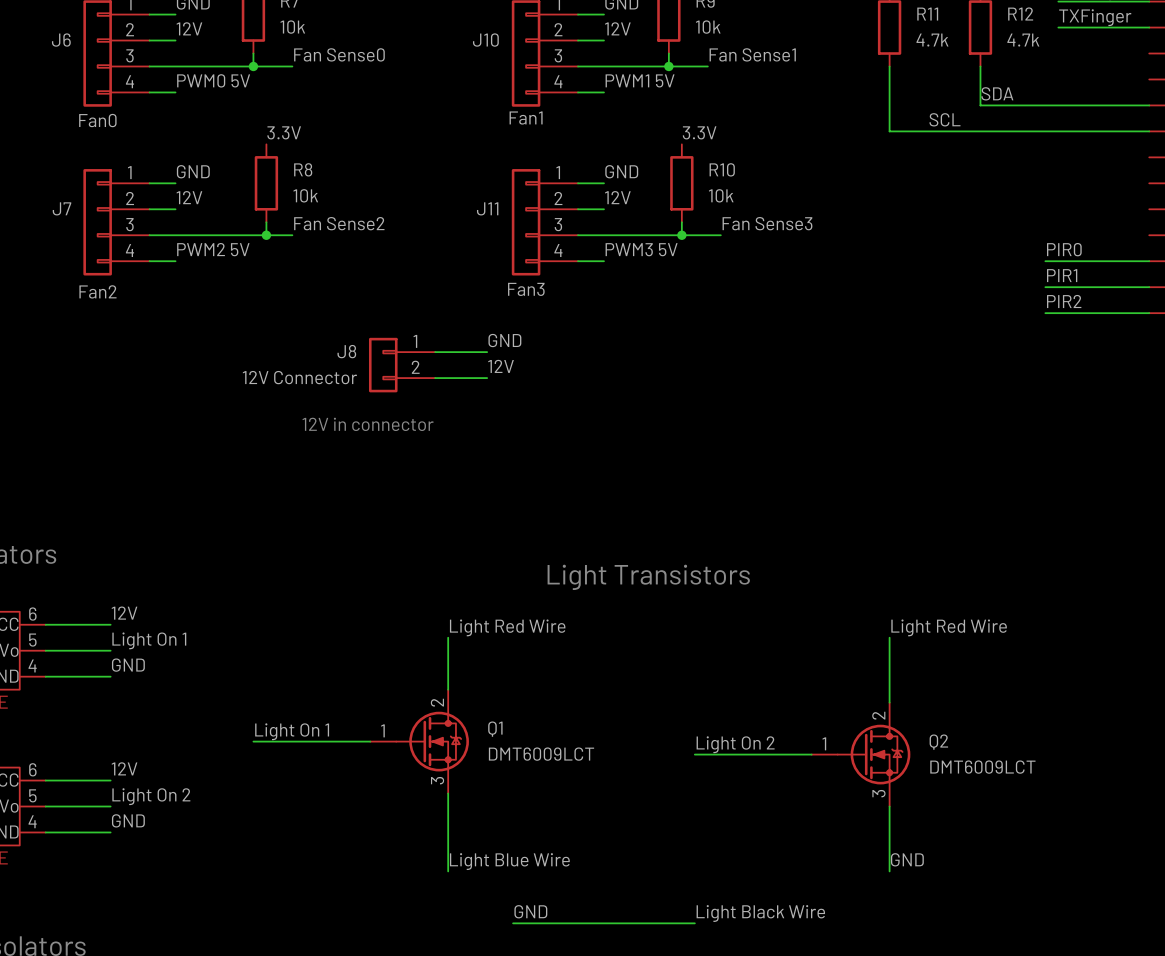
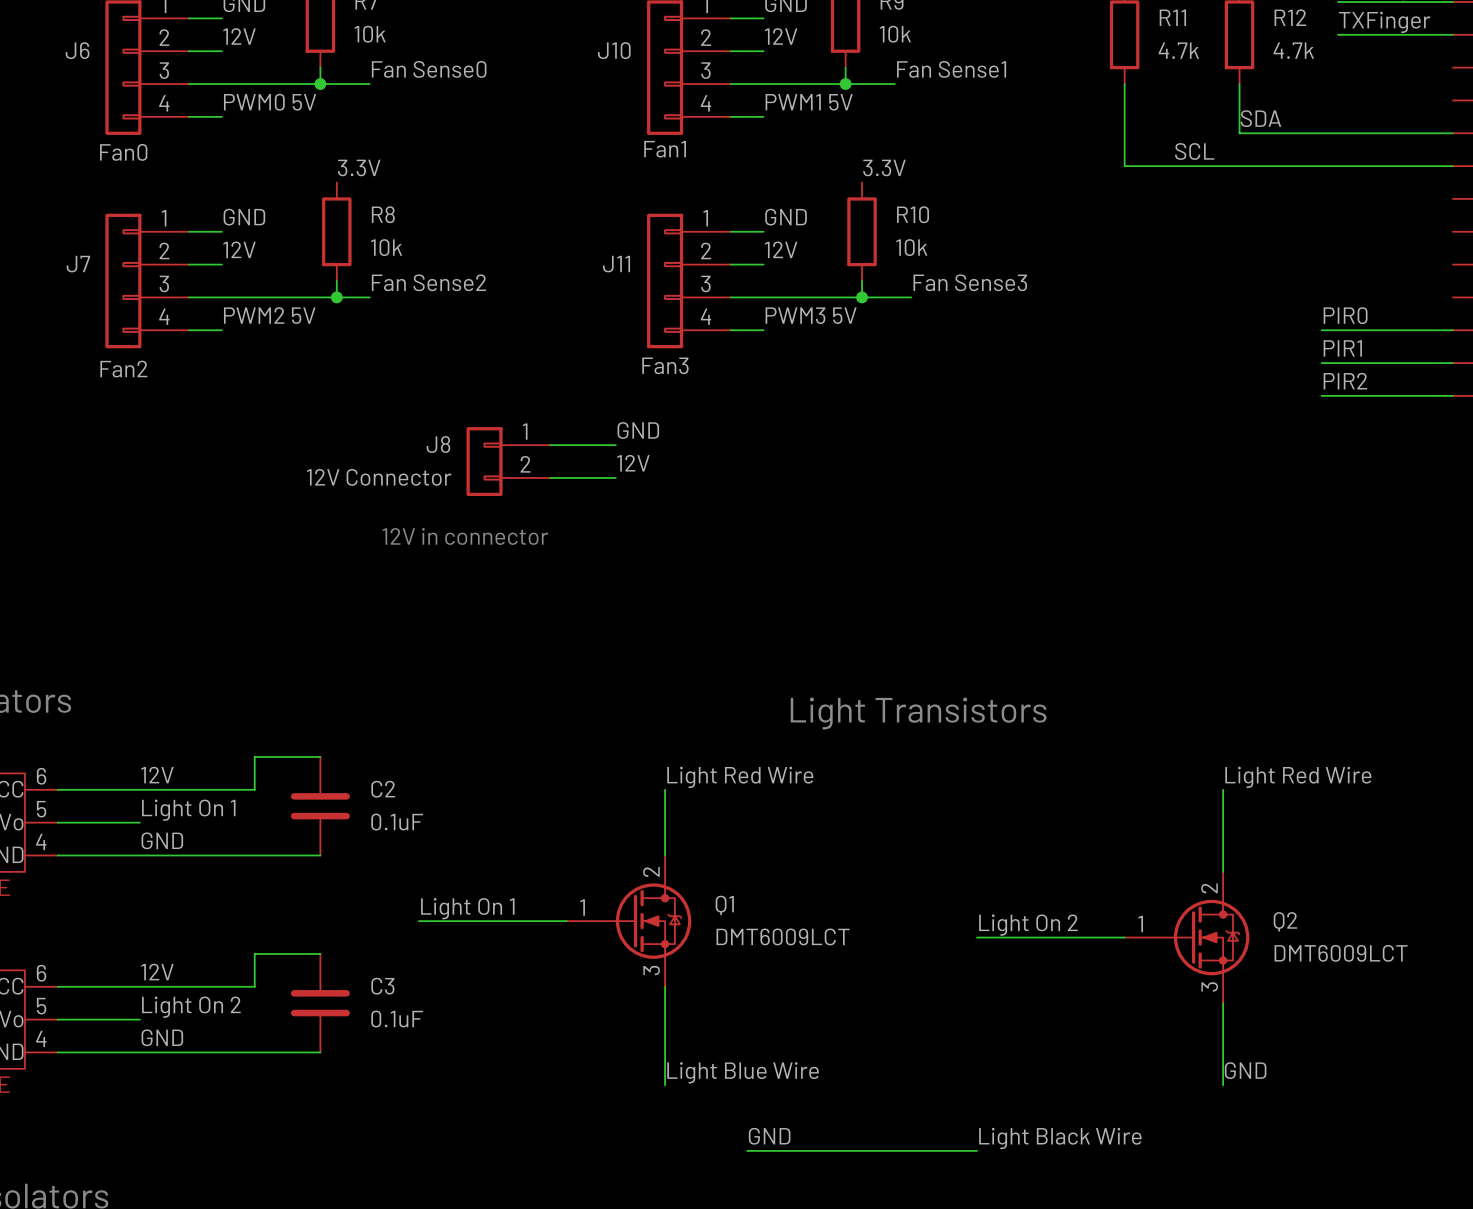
text position: Light Transistors (648, 577) -> Light Transistors (918, 713)
wire: none -> (320, 757) (254, 757) (254, 789) (139, 789)
label position: Light Red Wire (507, 627) -> Light Red Wire (740, 777)
label position: Light Red Wire (949, 627) -> Light Red Wire (1298, 777)
C2: none -> 0.1uF (320, 806)
wire: (448, 637) (448, 689) -> (665, 789) (665, 855)
wire: (889, 637) (889, 702) -> (1223, 789) (1223, 871)
wire: none -> (139, 855) (320, 855)
label position: Light On 1 (292, 731) -> Light On 1 (467, 908)
wire: (253, 741) (370, 741) -> (418, 921) (566, 921)
Q1 position: (419, 741) -> (628, 921)
label position: Light On 2 (735, 744) -> Light On 2 (1028, 925)
wire: none -> (320, 953) (254, 953) (254, 986) (139, 986)
wire: (694, 754) (811, 754) -> (976, 937) (1124, 937)
Q2 position: (861, 754) -> (1187, 937)
C3: none -> 0.1uF (320, 1003)
wire: (448, 793) (448, 871) -> (665, 986) (665, 1085)
wire: (889, 806) (889, 871) -> (1223, 1003) (1223, 1085)
wire: none -> (139, 1052) (320, 1052)
label position: GND (907, 859) -> GND (1245, 1070)
label position: Light Blue Wire (509, 861) -> Light Blue Wire (743, 1072)
label position: GND (530, 911) -> GND (769, 1136)
label position: Light Black Wire (760, 913) -> Light Black Wire (1060, 1138)
wire: (513, 923) (694, 923) -> (747, 1150) (976, 1150)

